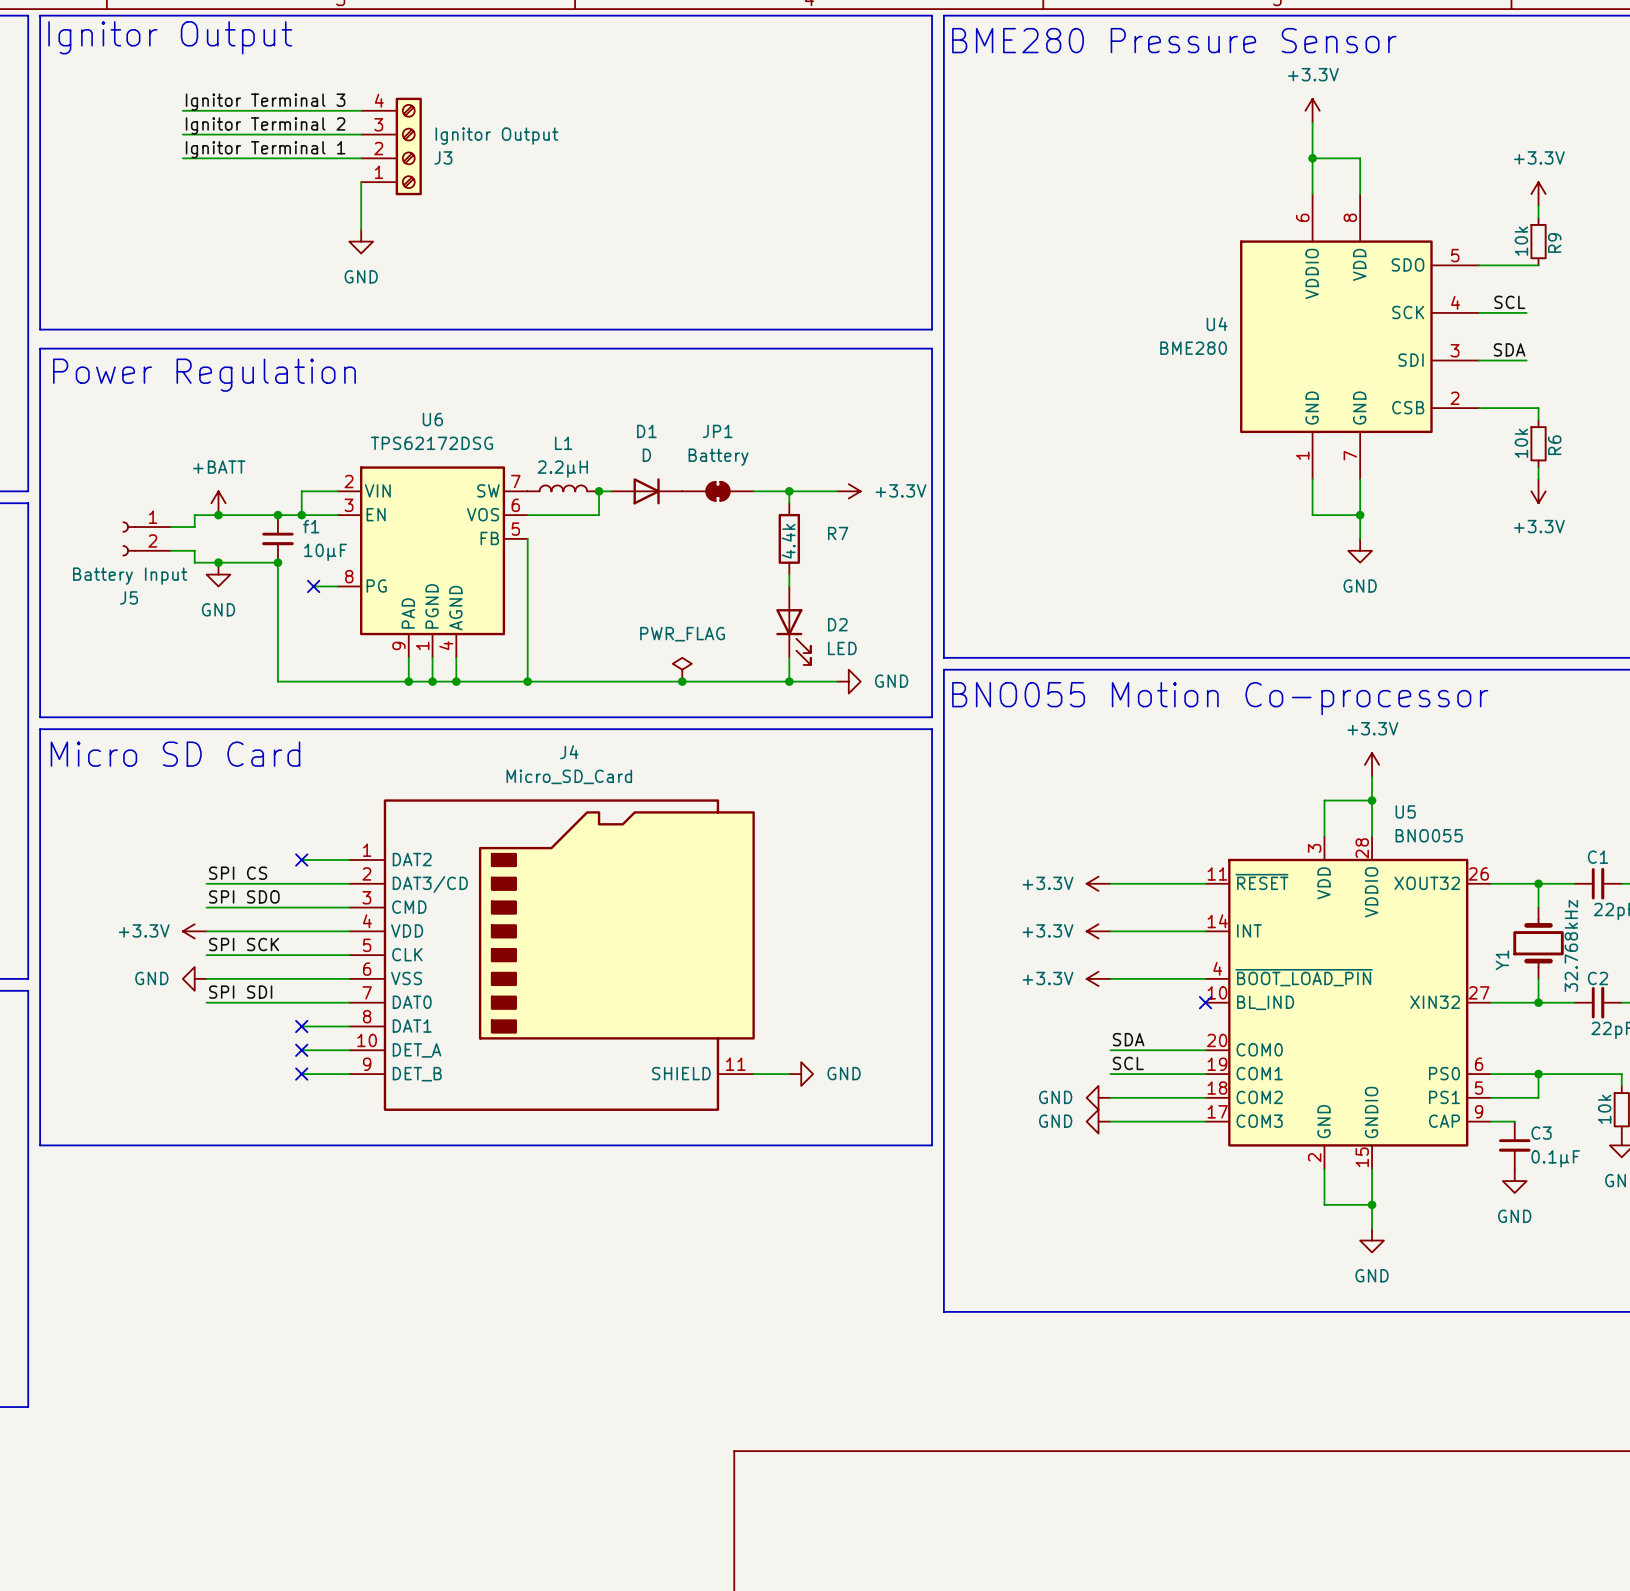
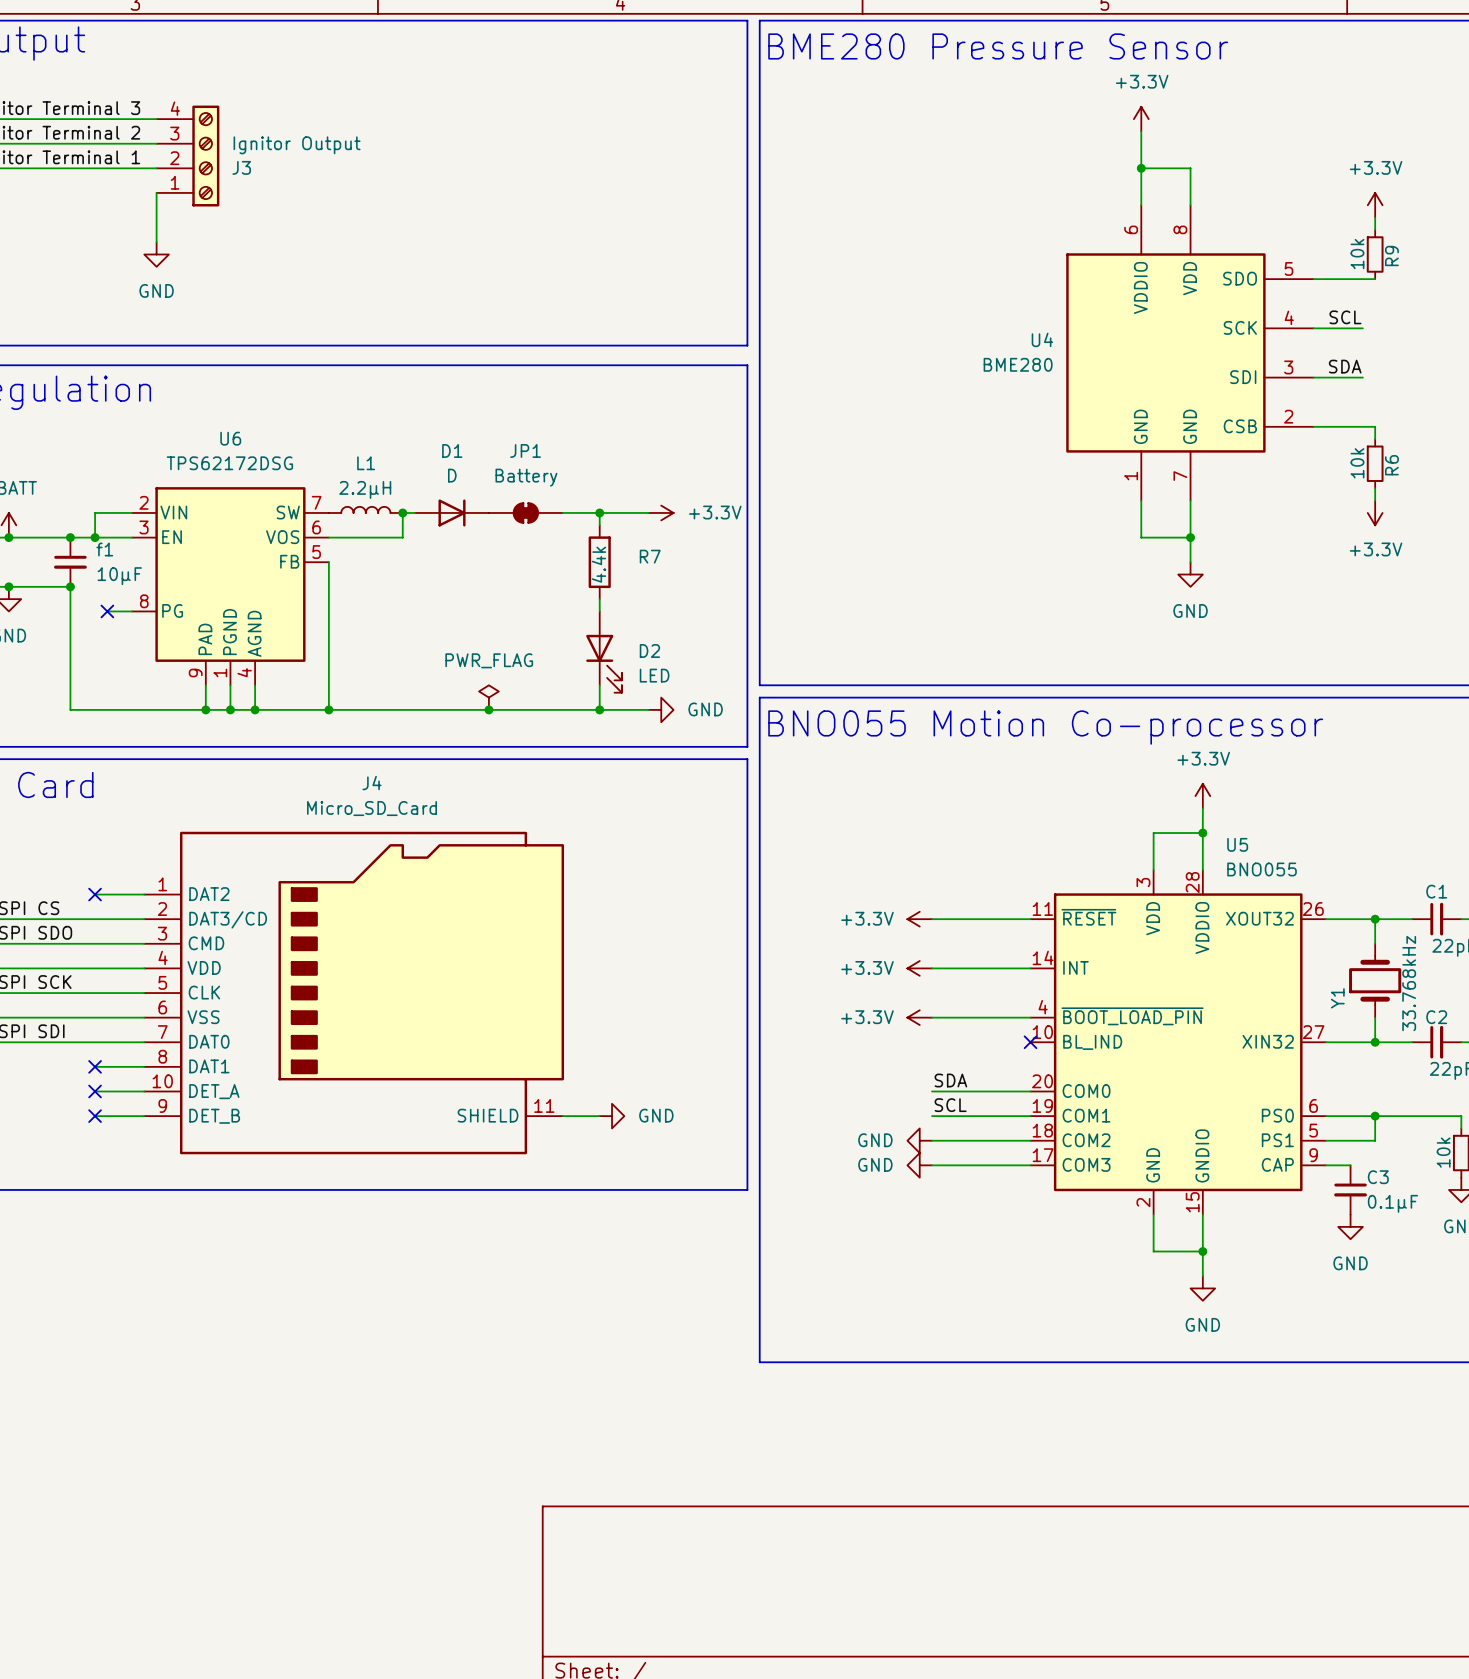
Y1 value: 32.768kHz (1571, 945) -> 33.768kHz (1409, 983)

